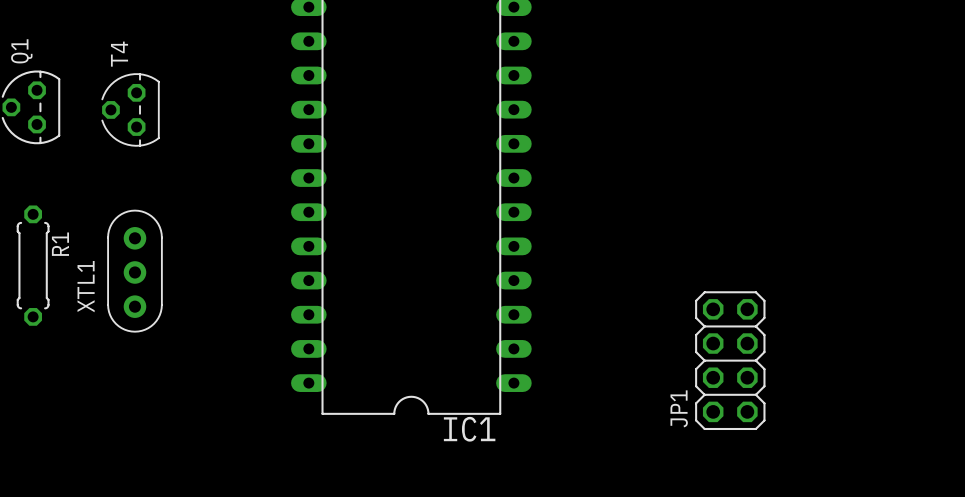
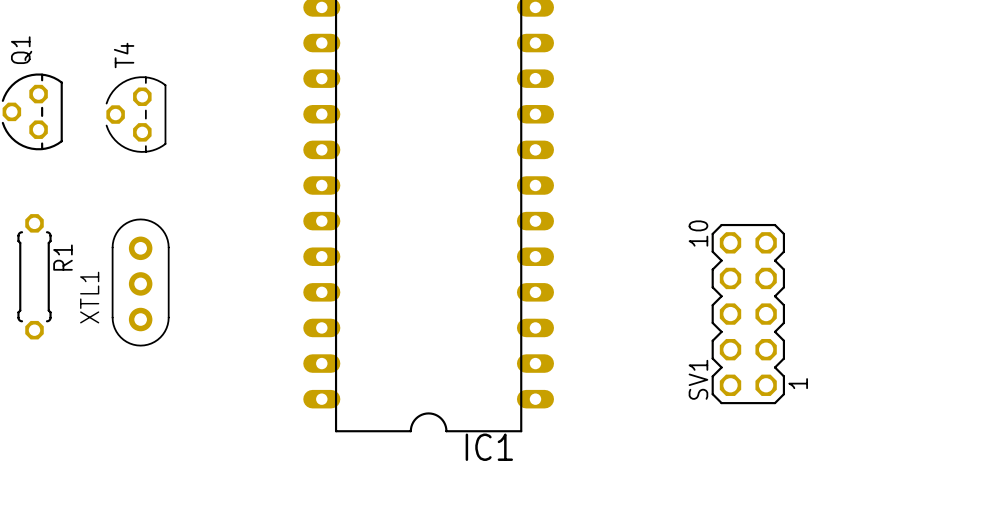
SV1: none -> (748, 314)
JP1: (730, 360) -> none

